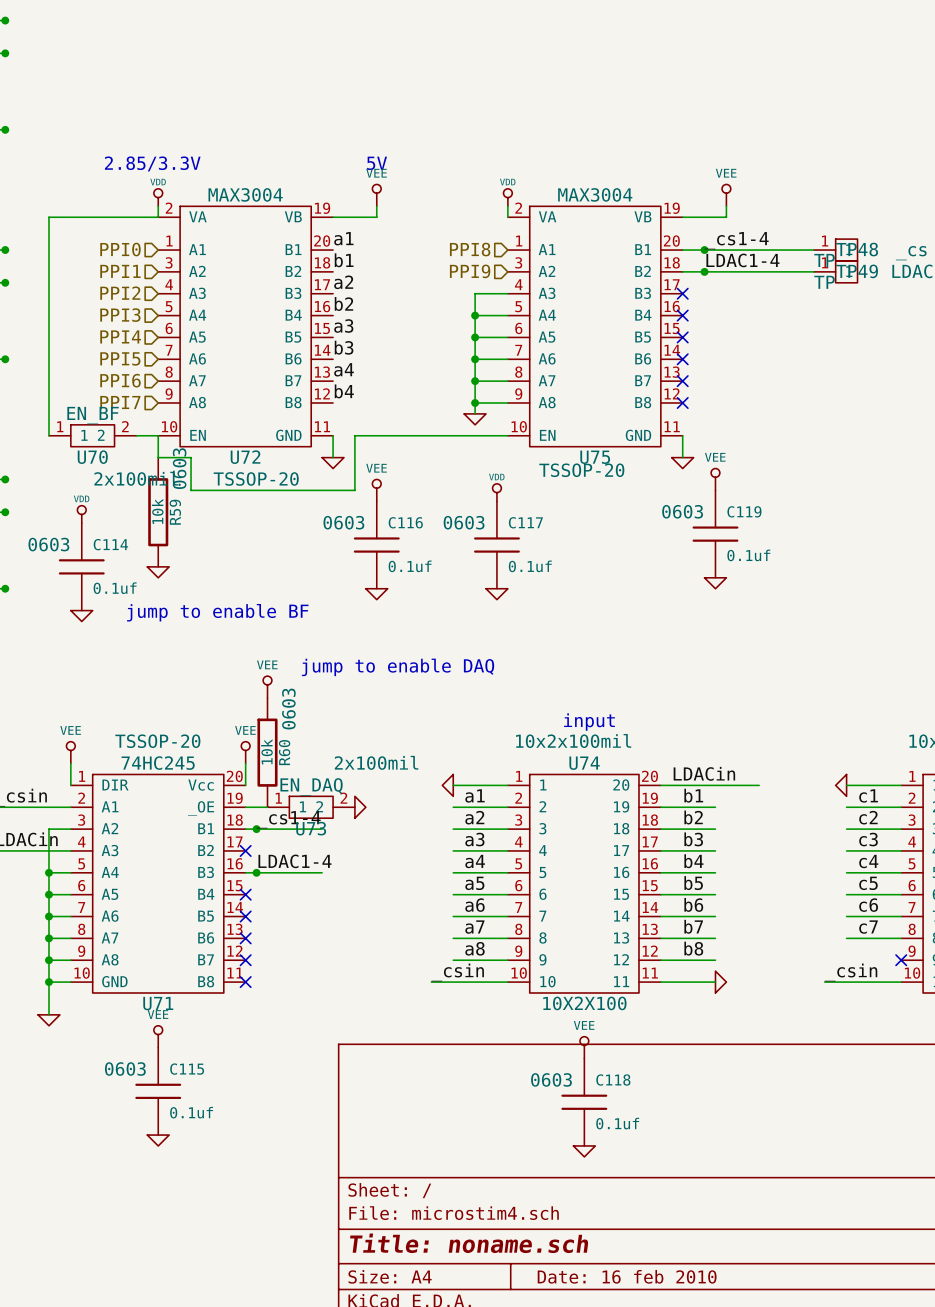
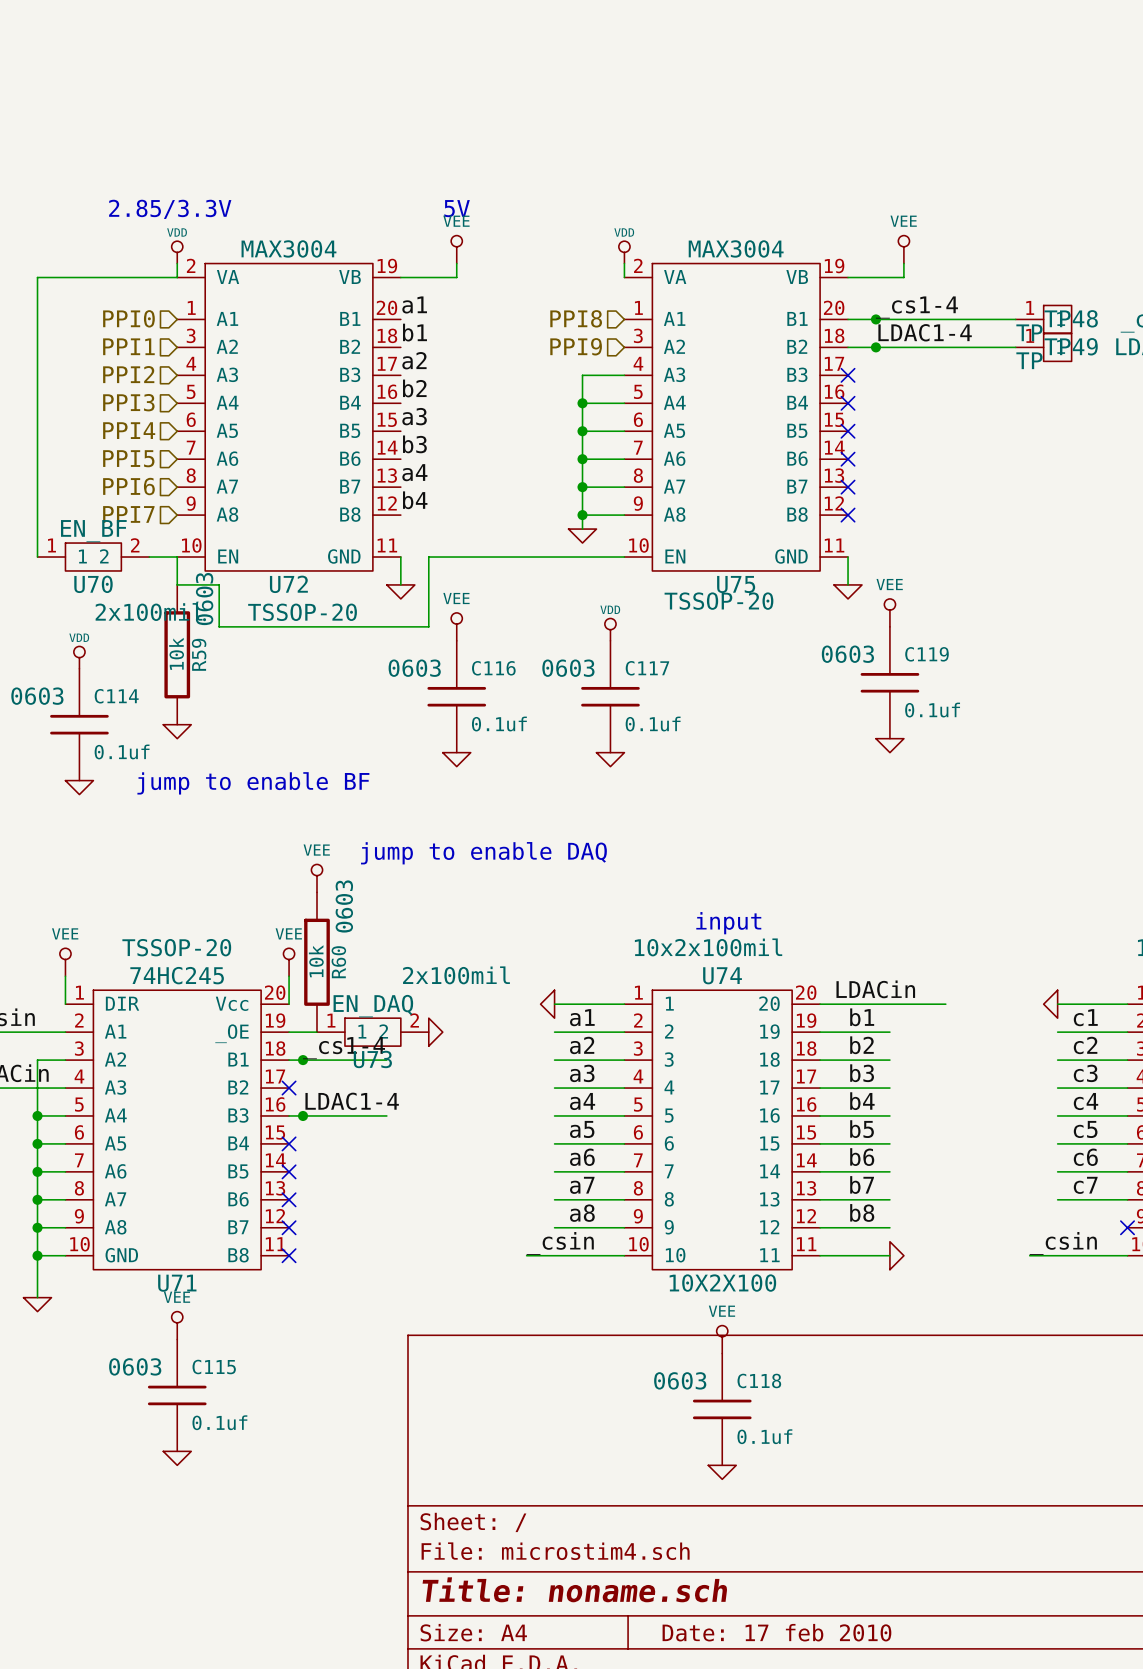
title block: Date: 16 feb 2010 (627, 1276) -> Date: 17 feb 2010 (776, 1632)

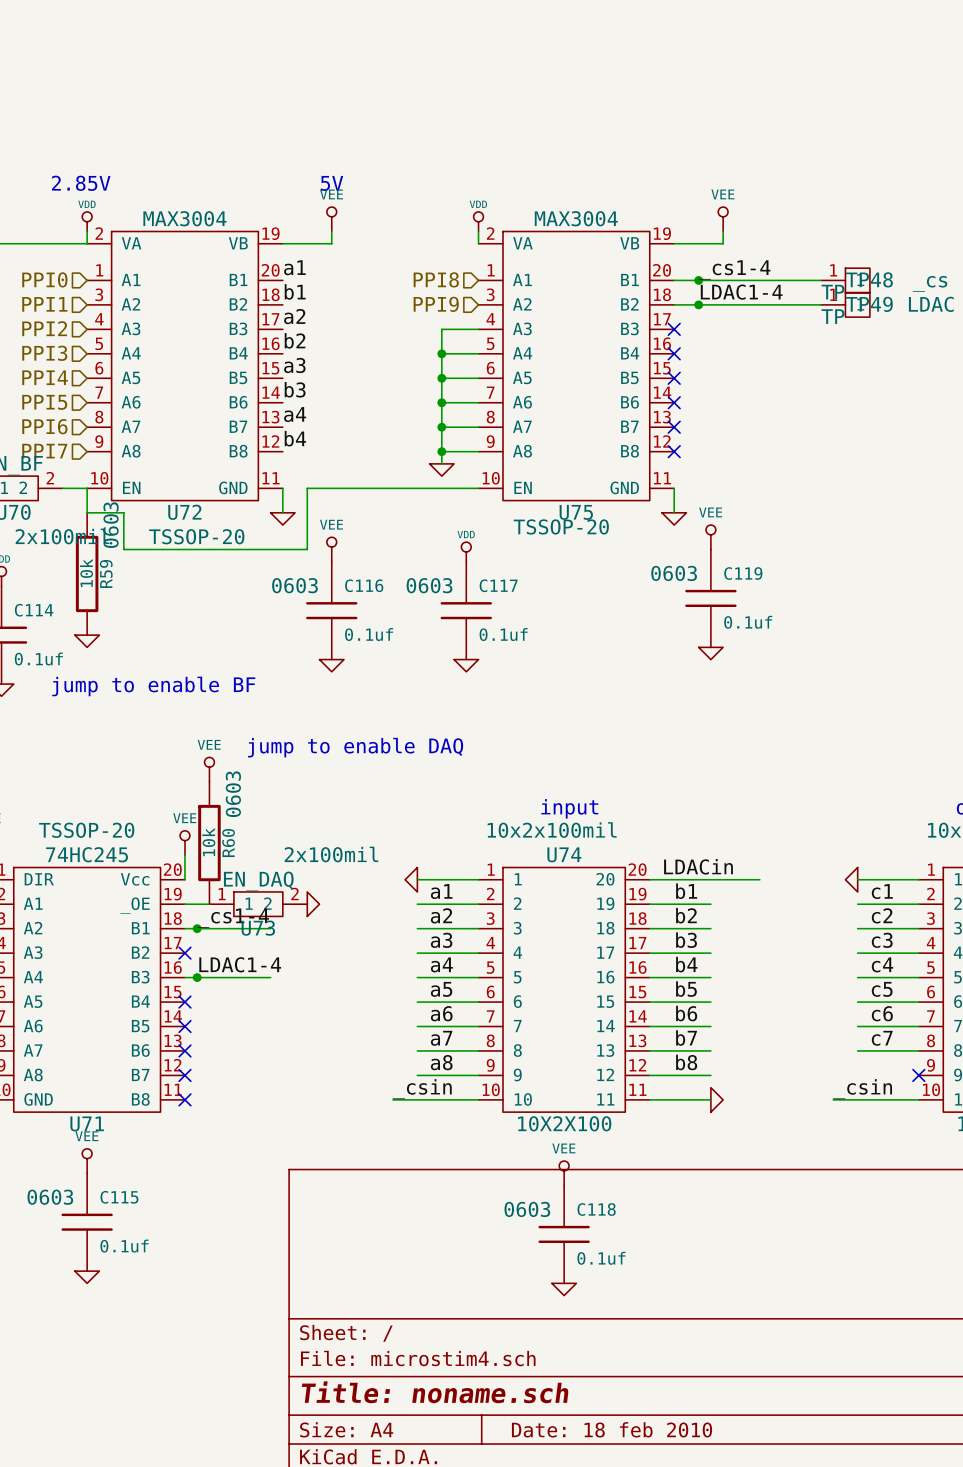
text: 2.85/3.3V (170, 209) -> 2.85V (81, 183)
title block: Date: 17 feb 2010 (776, 1632) -> Date: 18 feb 2010 (612, 1429)

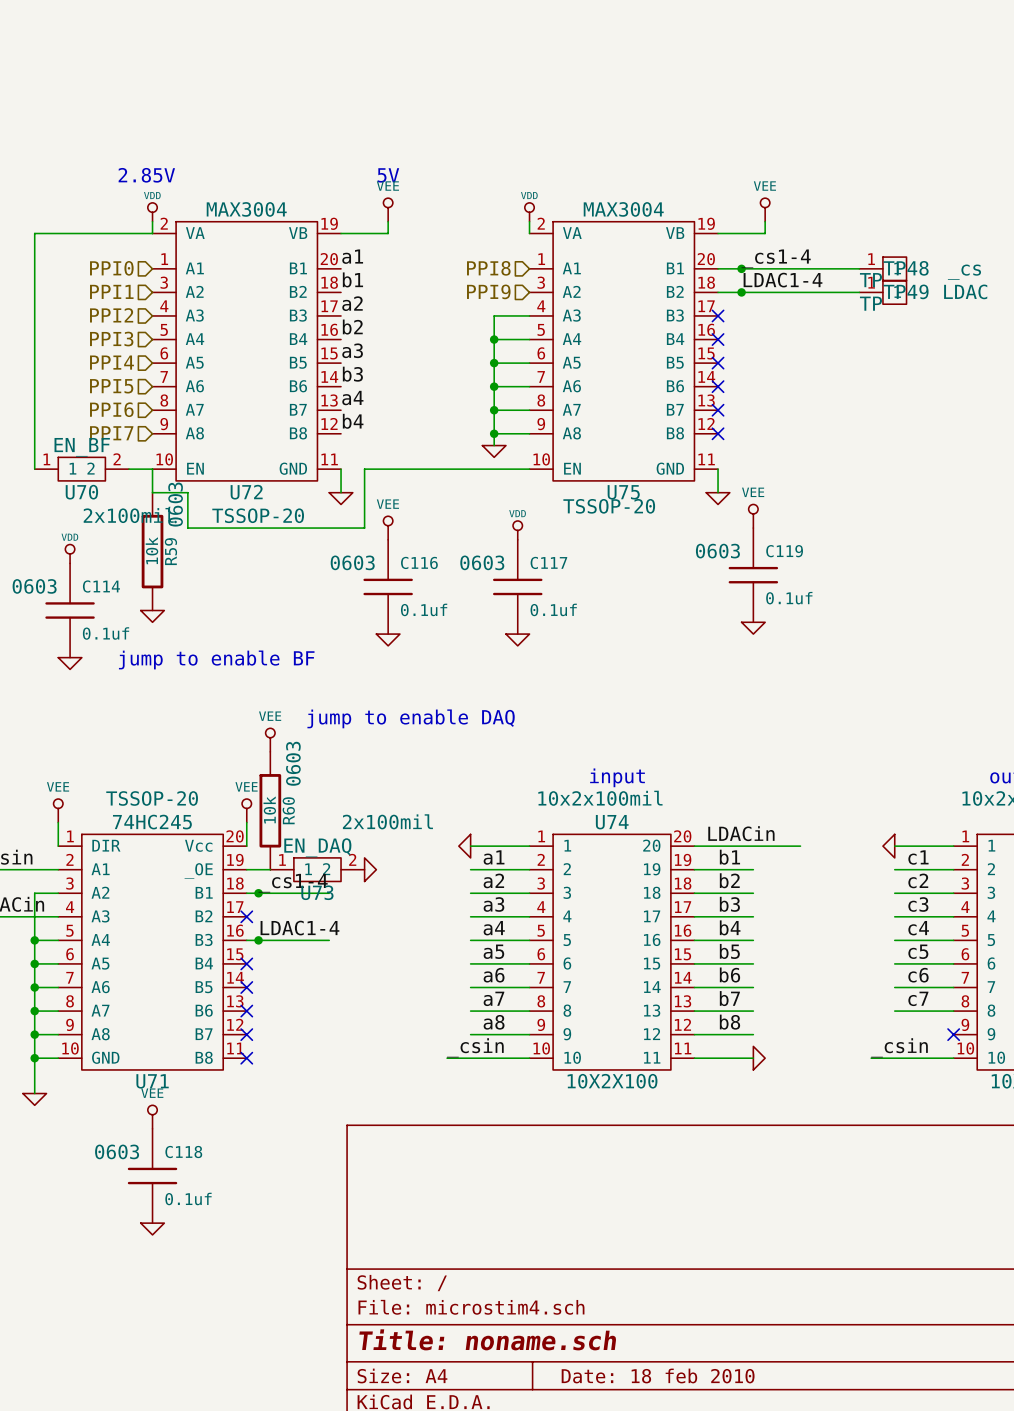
power symbol: VEE (564, 1173) -> none
C115 name: C115 (119, 1197) -> C118 (183, 1152)
C118: 0.1uf (564, 1234) -> none
power symbol: (564, 1289) -> none

